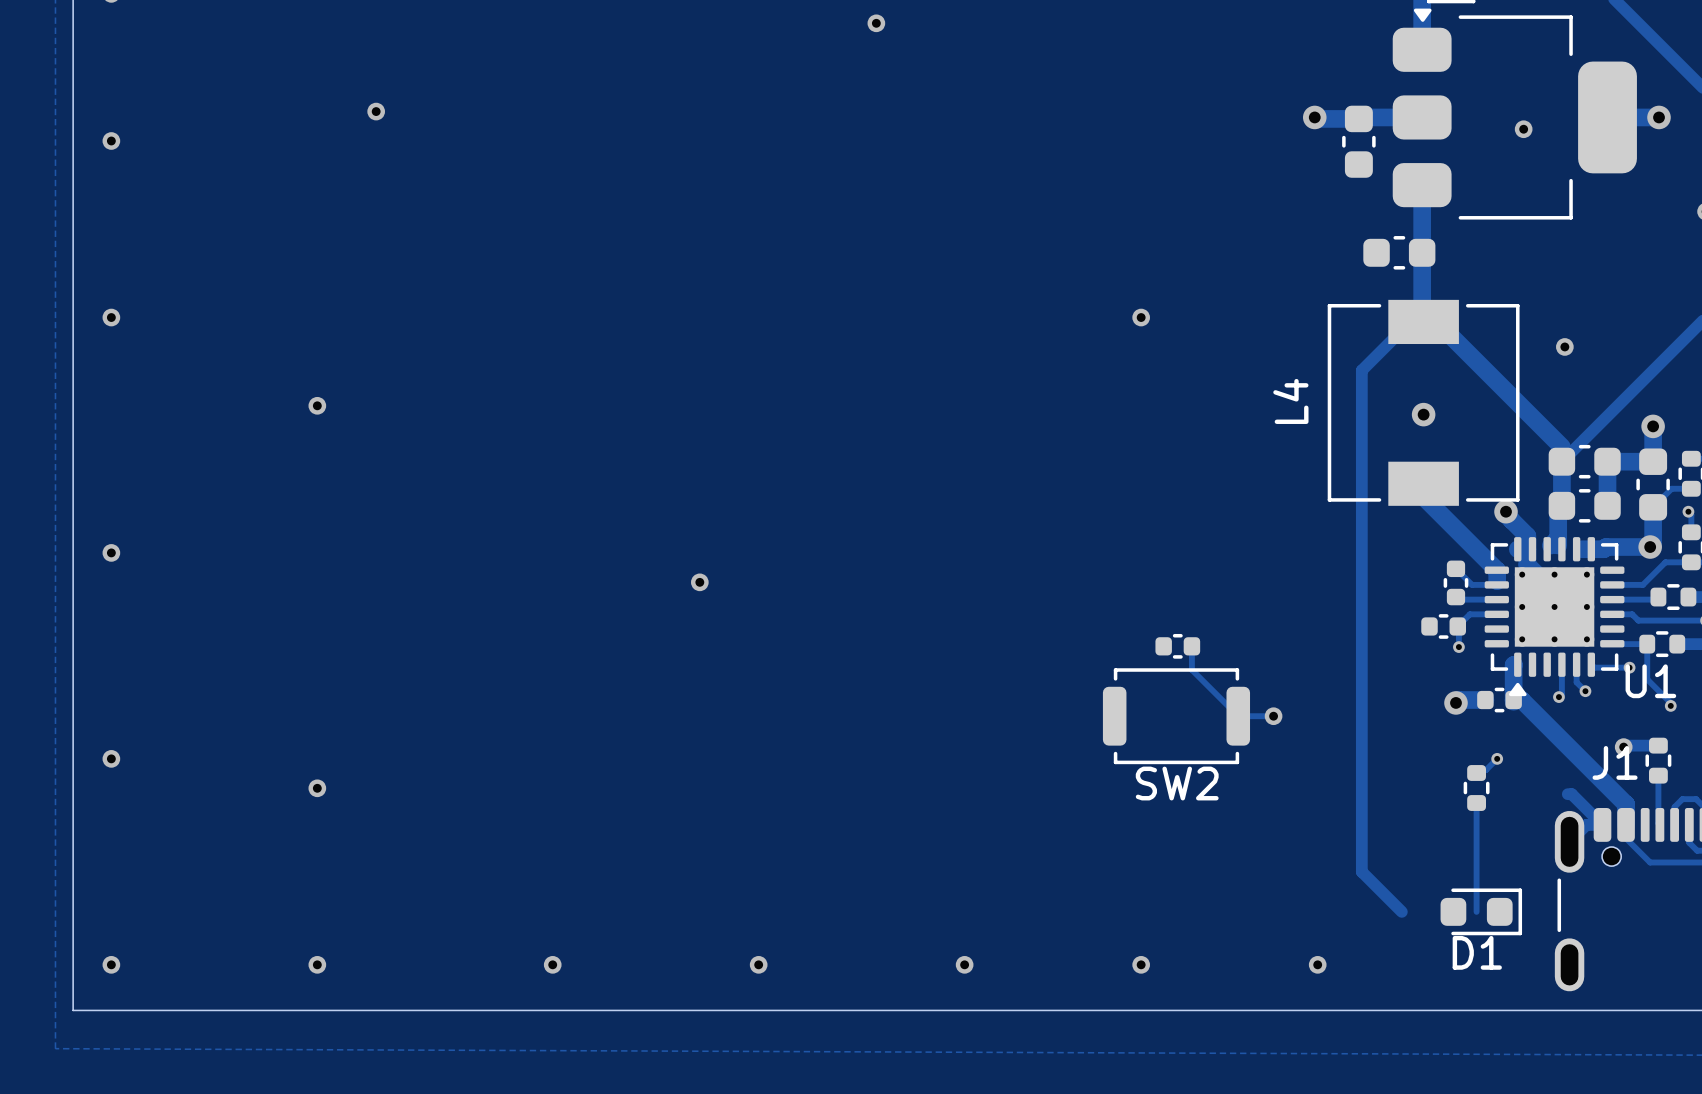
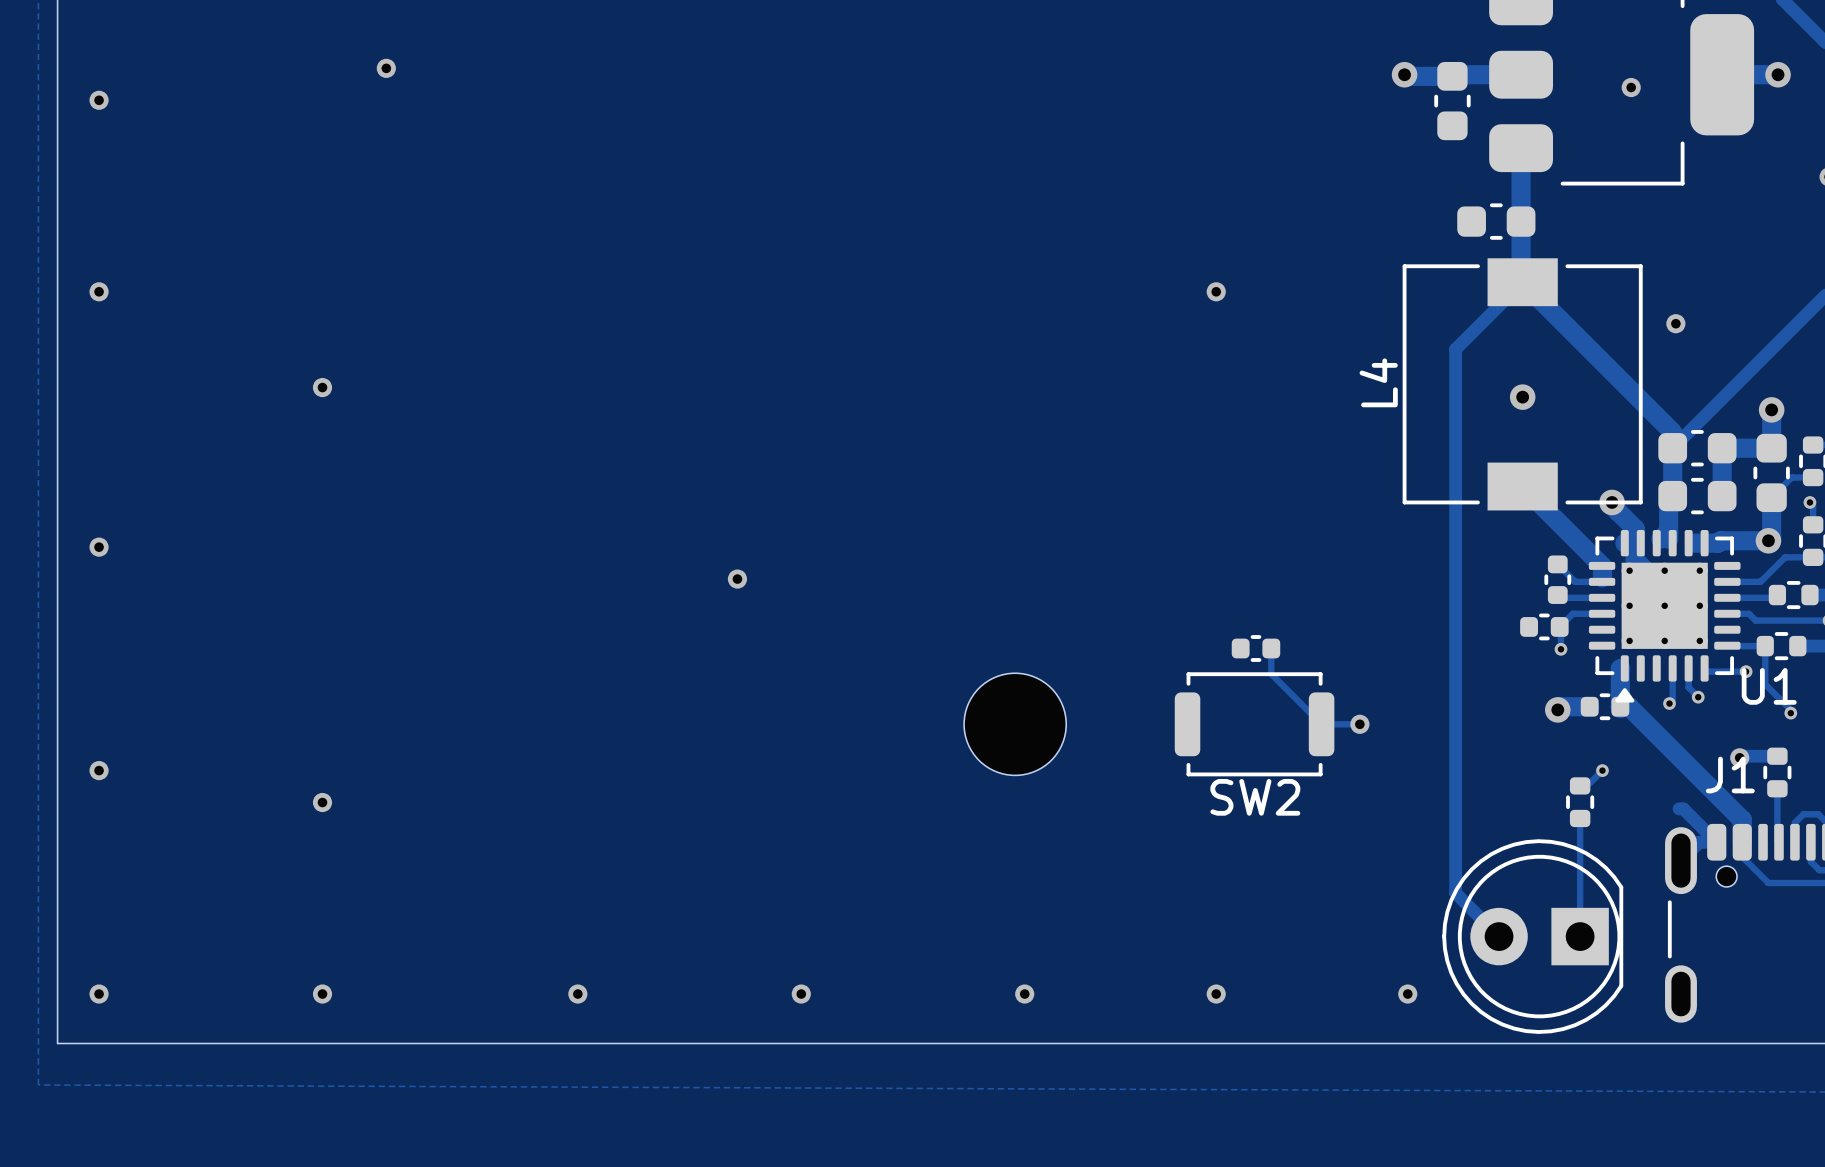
L4 footprint: [1327, 299, 1520, 506] -> [1402, 258, 1643, 511]
part: none -> (1015, 724)
part: none -> (1532, 936)
D1: (1481, 911) -> none

